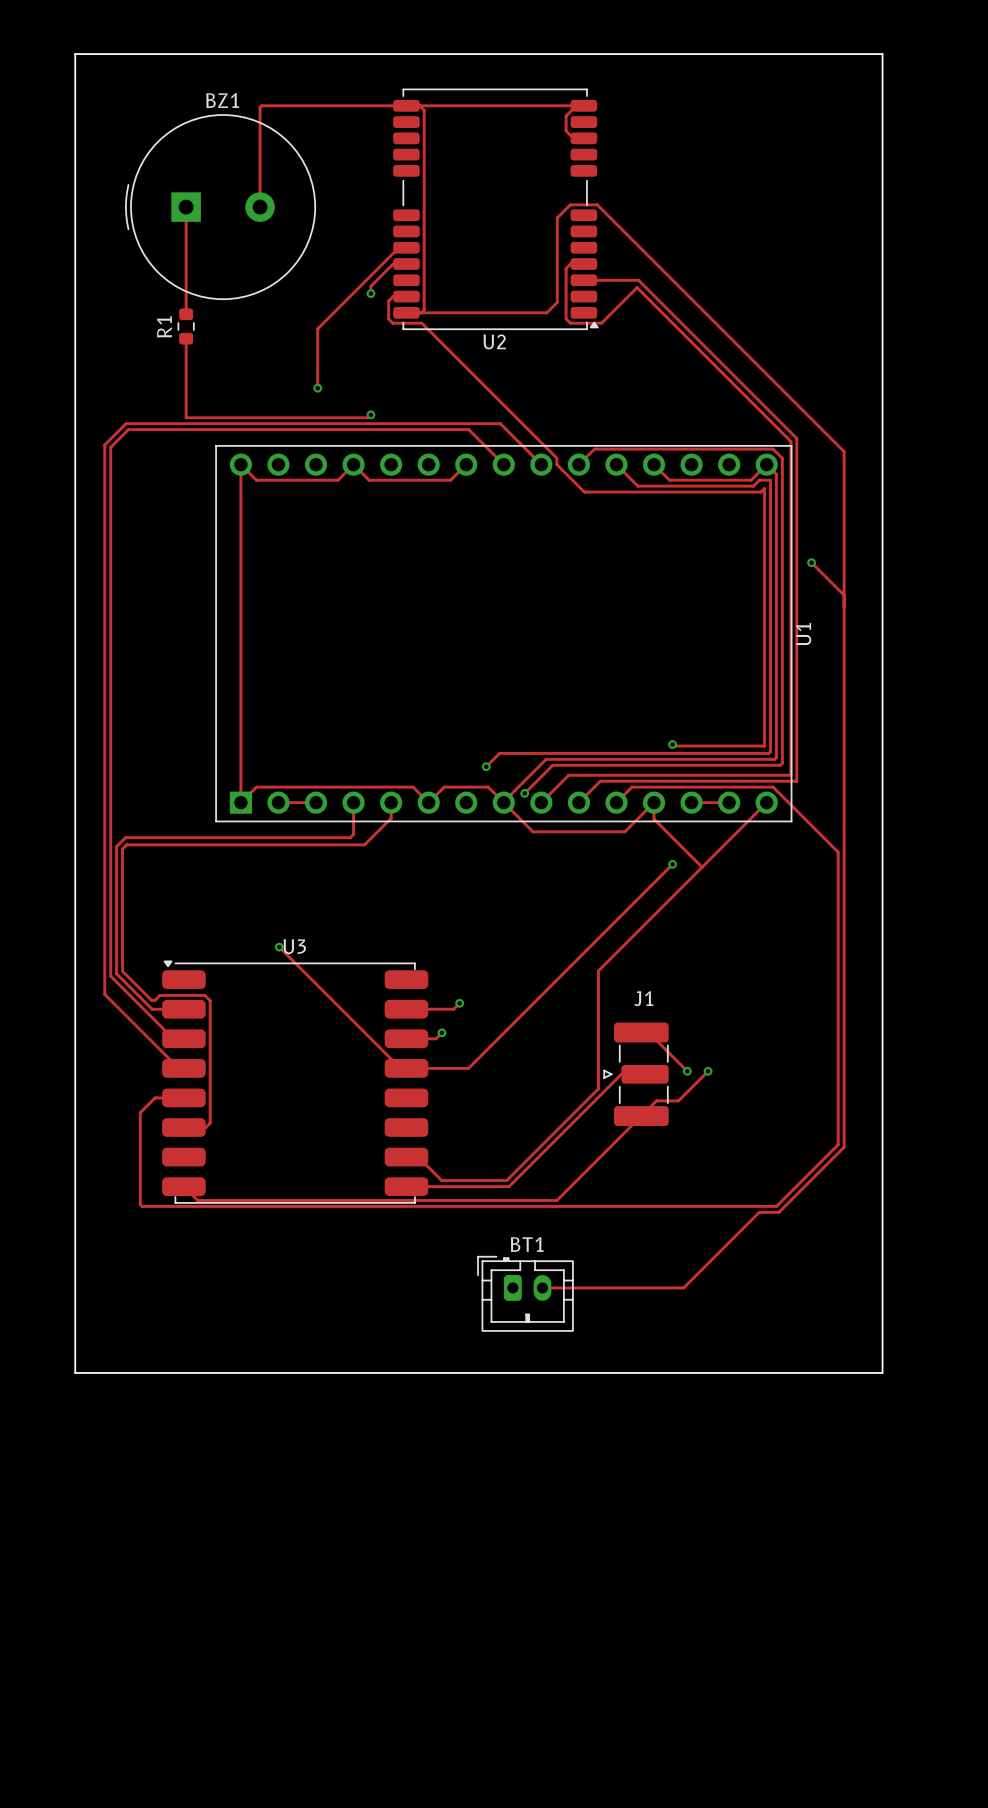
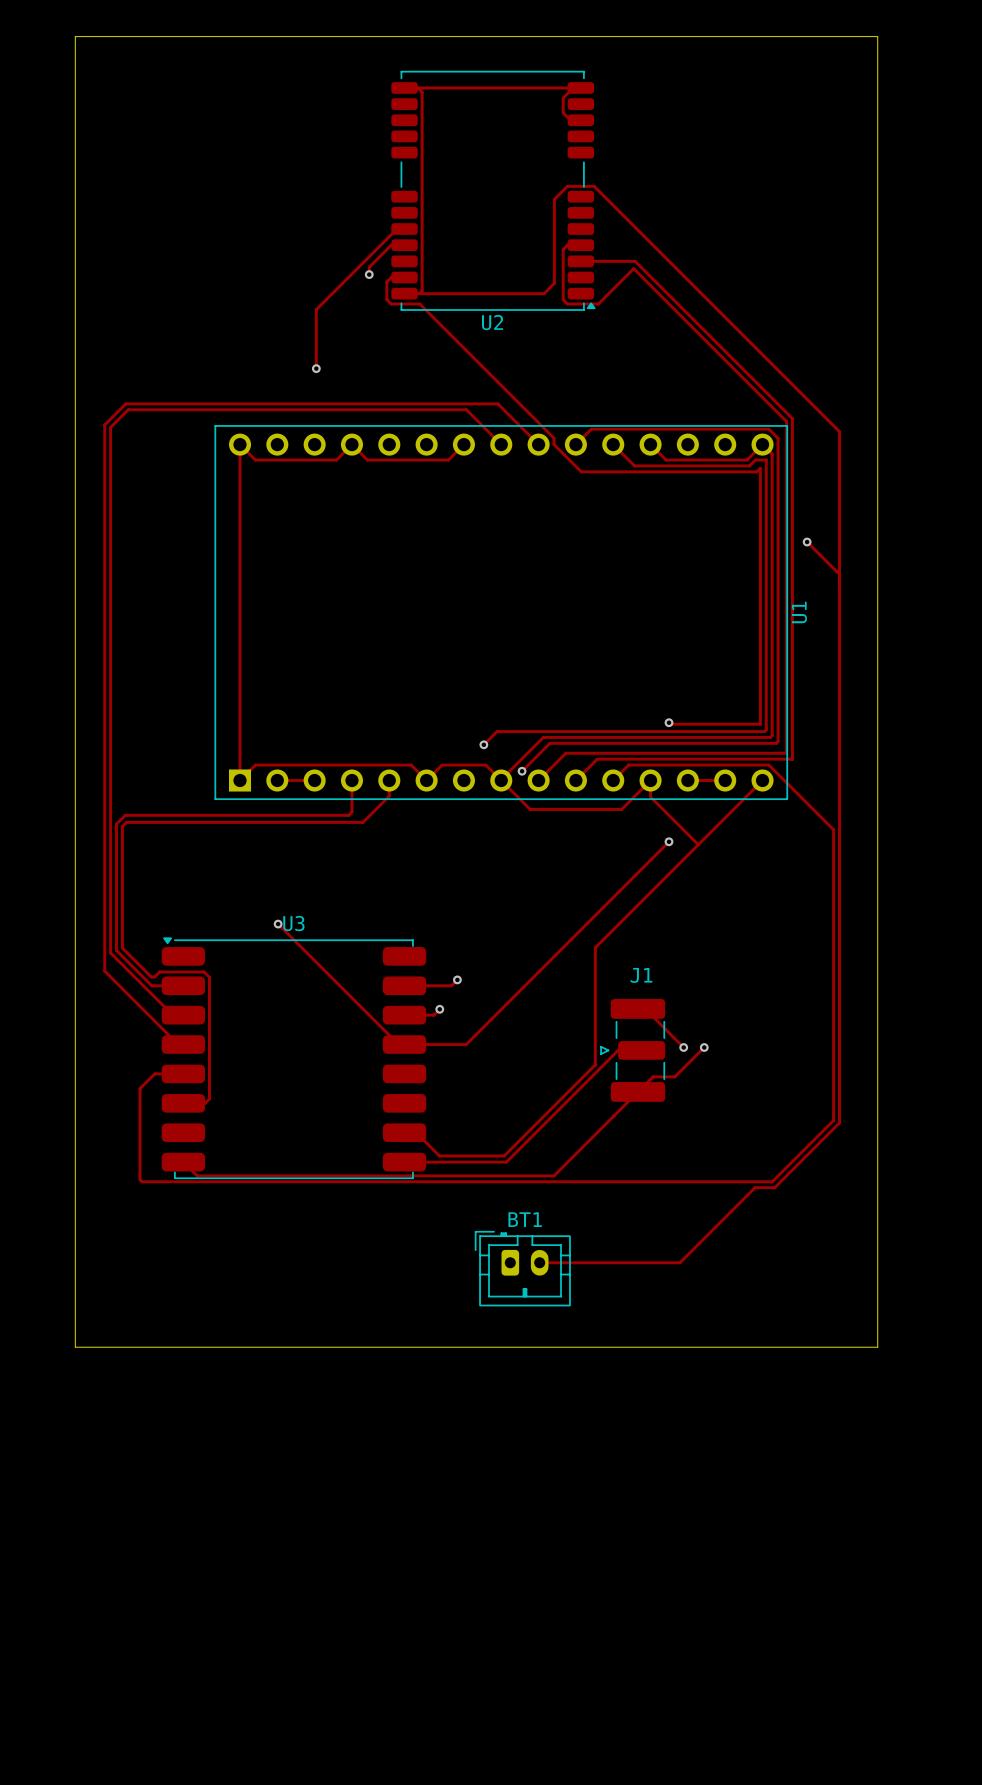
track: (406, 105) (261, 105) (260, 207) -> none
track: (186, 207) (186, 314) -> none
BZ1: (220, 207) -> none
R1: (186, 326) -> none
track: (186, 338) (186, 417) (368, 417) (370, 414) -> none
via: (370, 414) -> none

